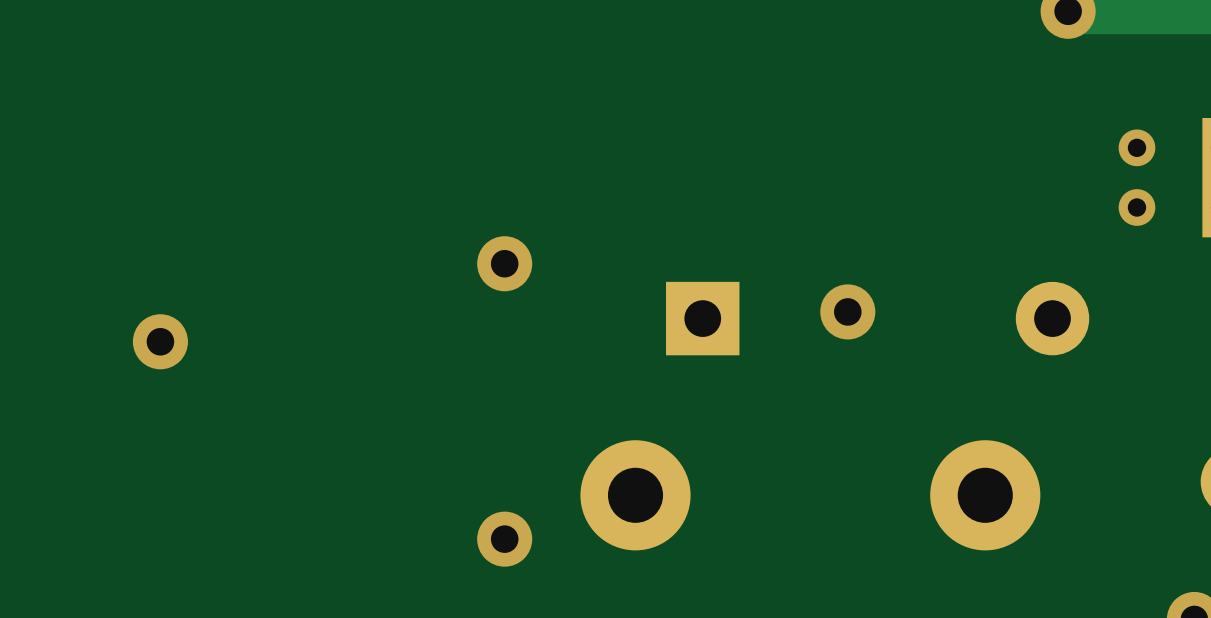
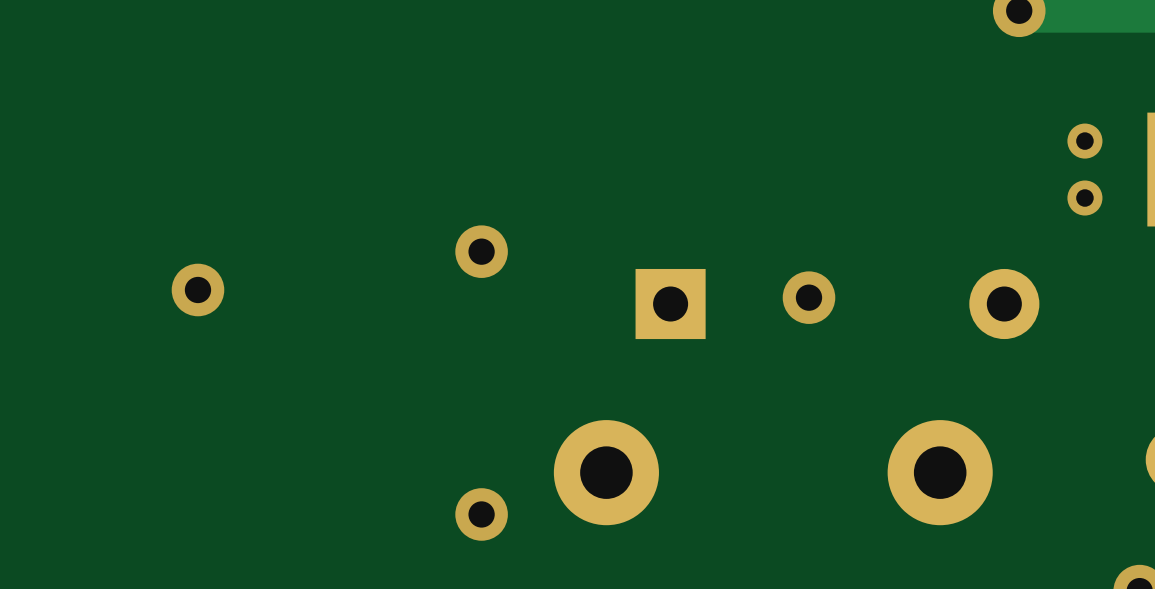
via position: (160, 341) -> (197, 289)

